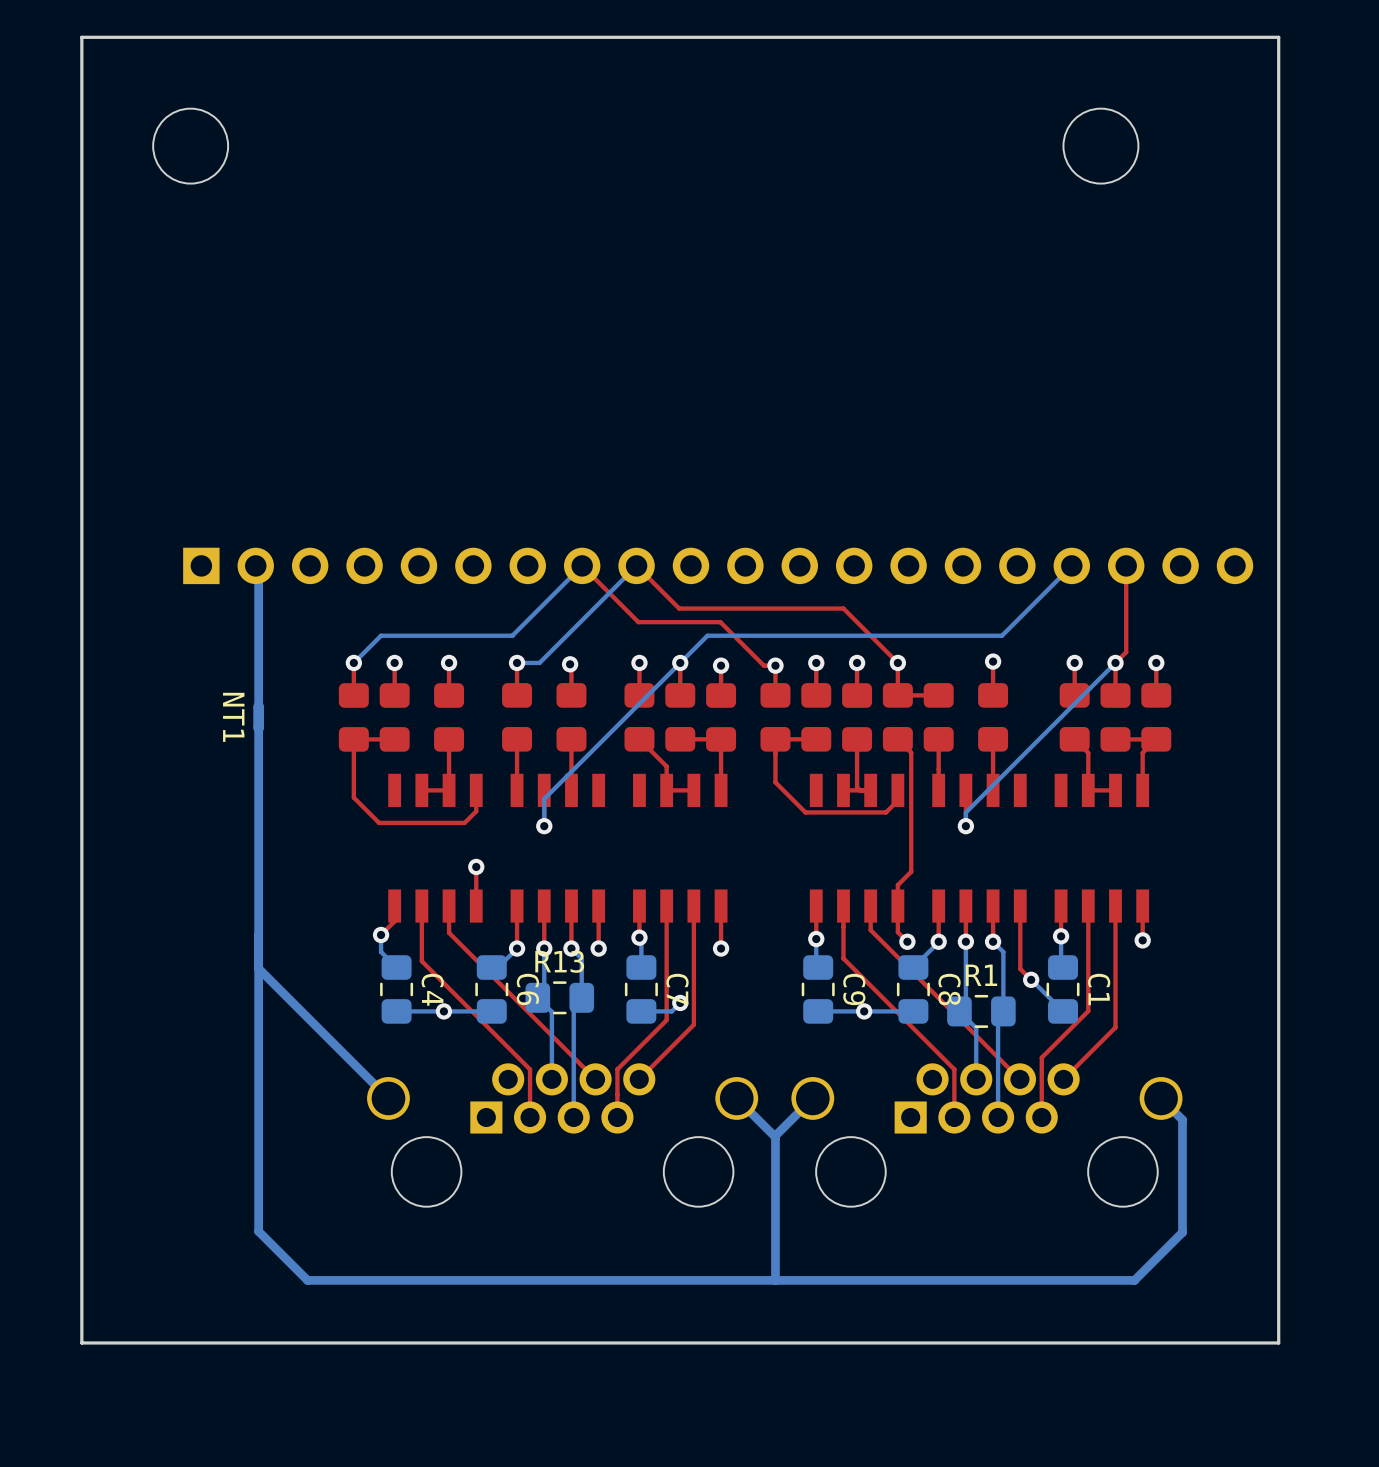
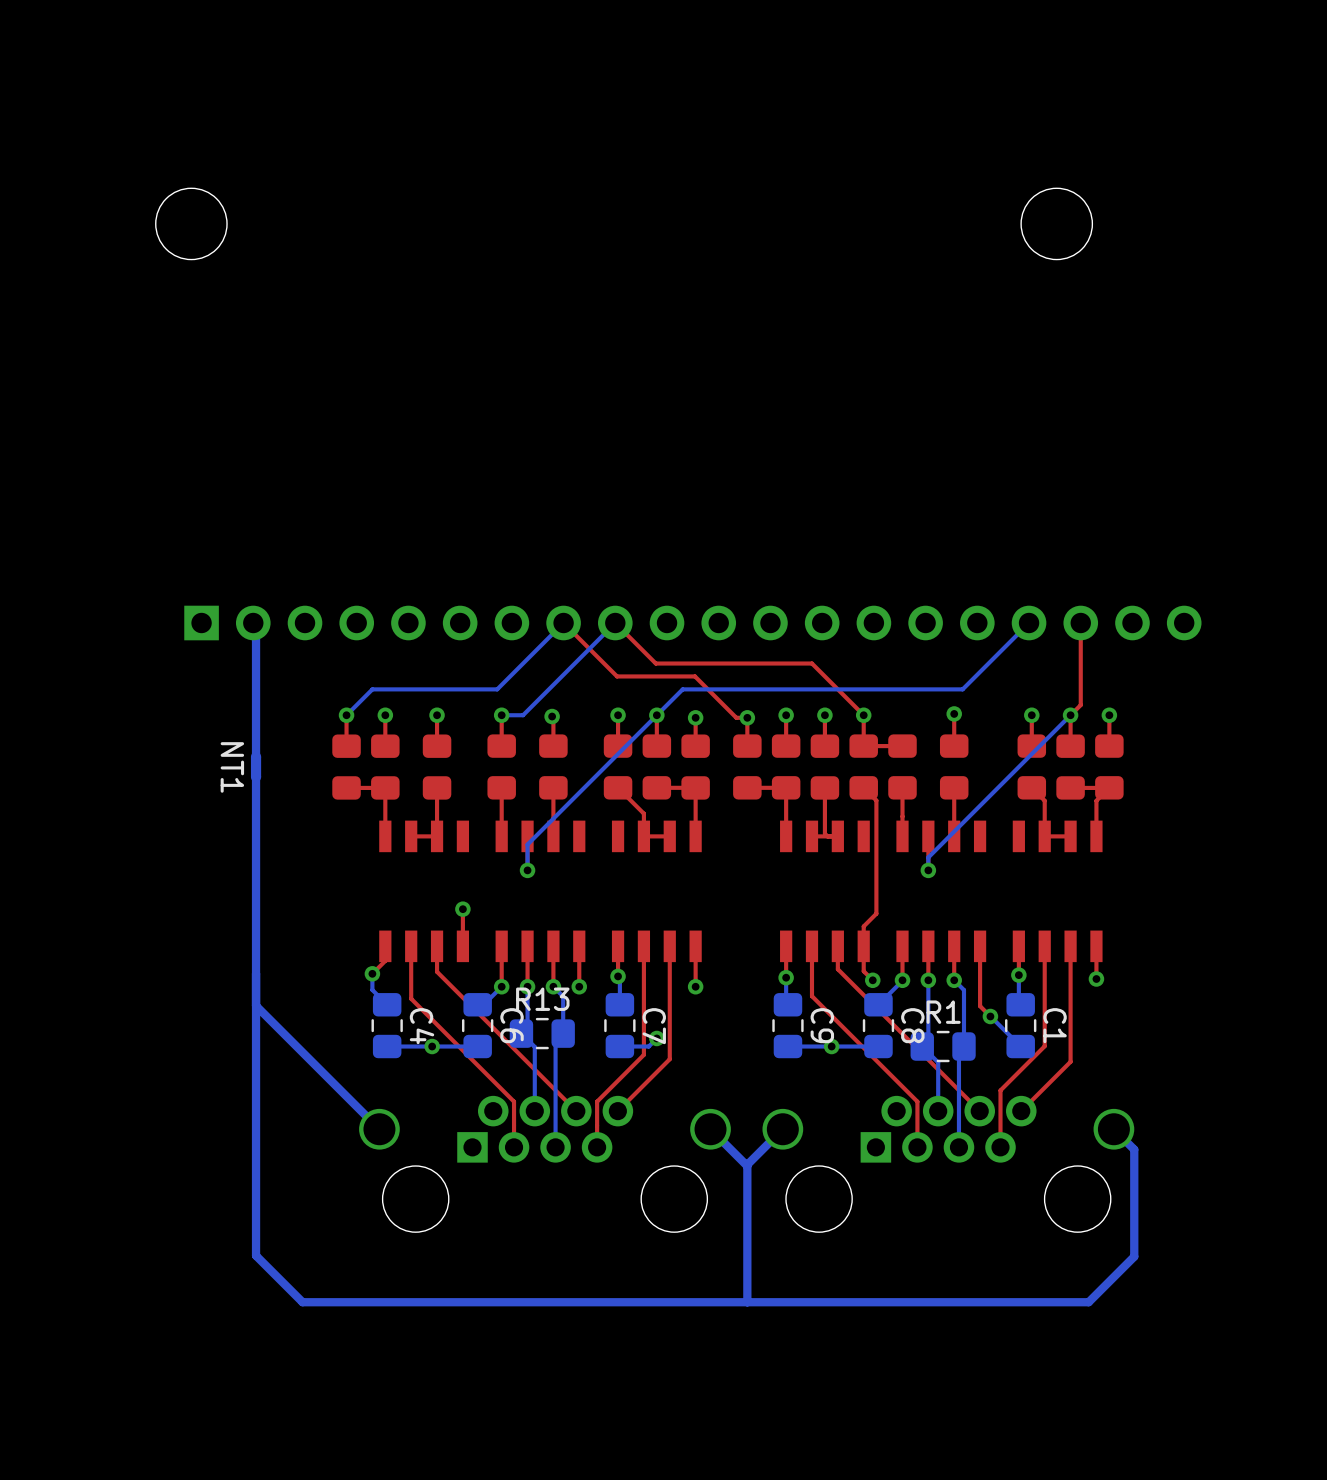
board edge: (1278, 37) (81, 37) (81, 1342) (1278, 1342) (1278, 37) -> none
top track: (353, 739) (353, 797) (379, 822) (464, 822) (476, 811) (476, 790) -> none
top track: none -> (385, 787) (385, 836)
top track: (775, 739) (775, 782) (805, 812) (886, 812) (897, 800) (897, 790) -> none
top track: none -> (786, 787) (786, 836)

